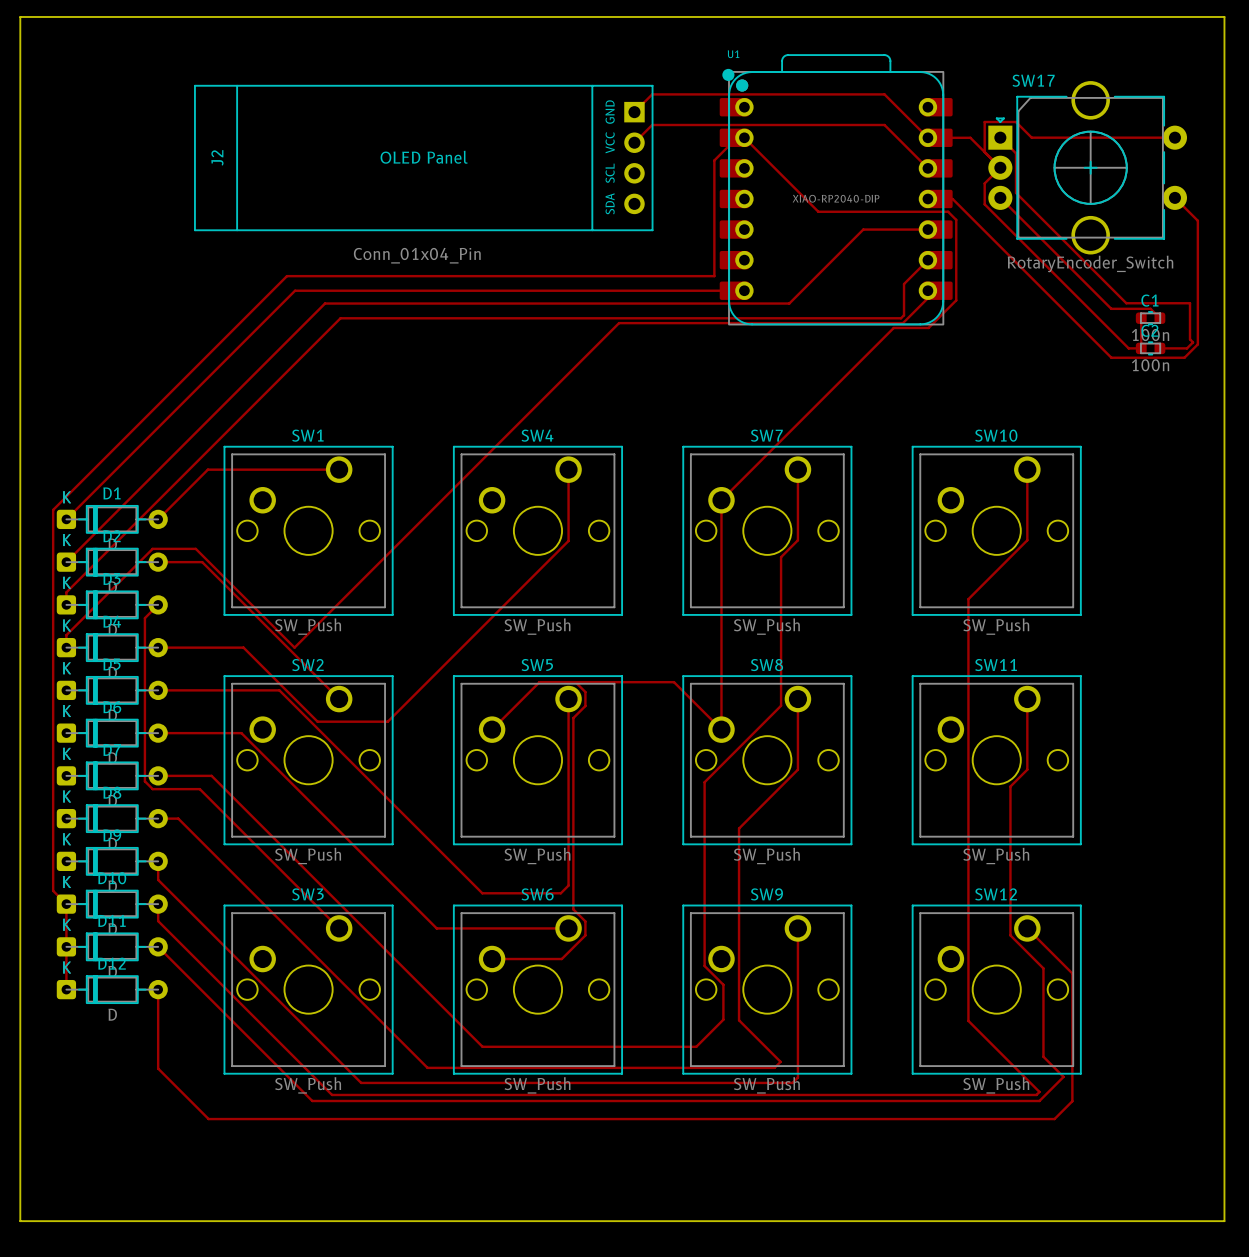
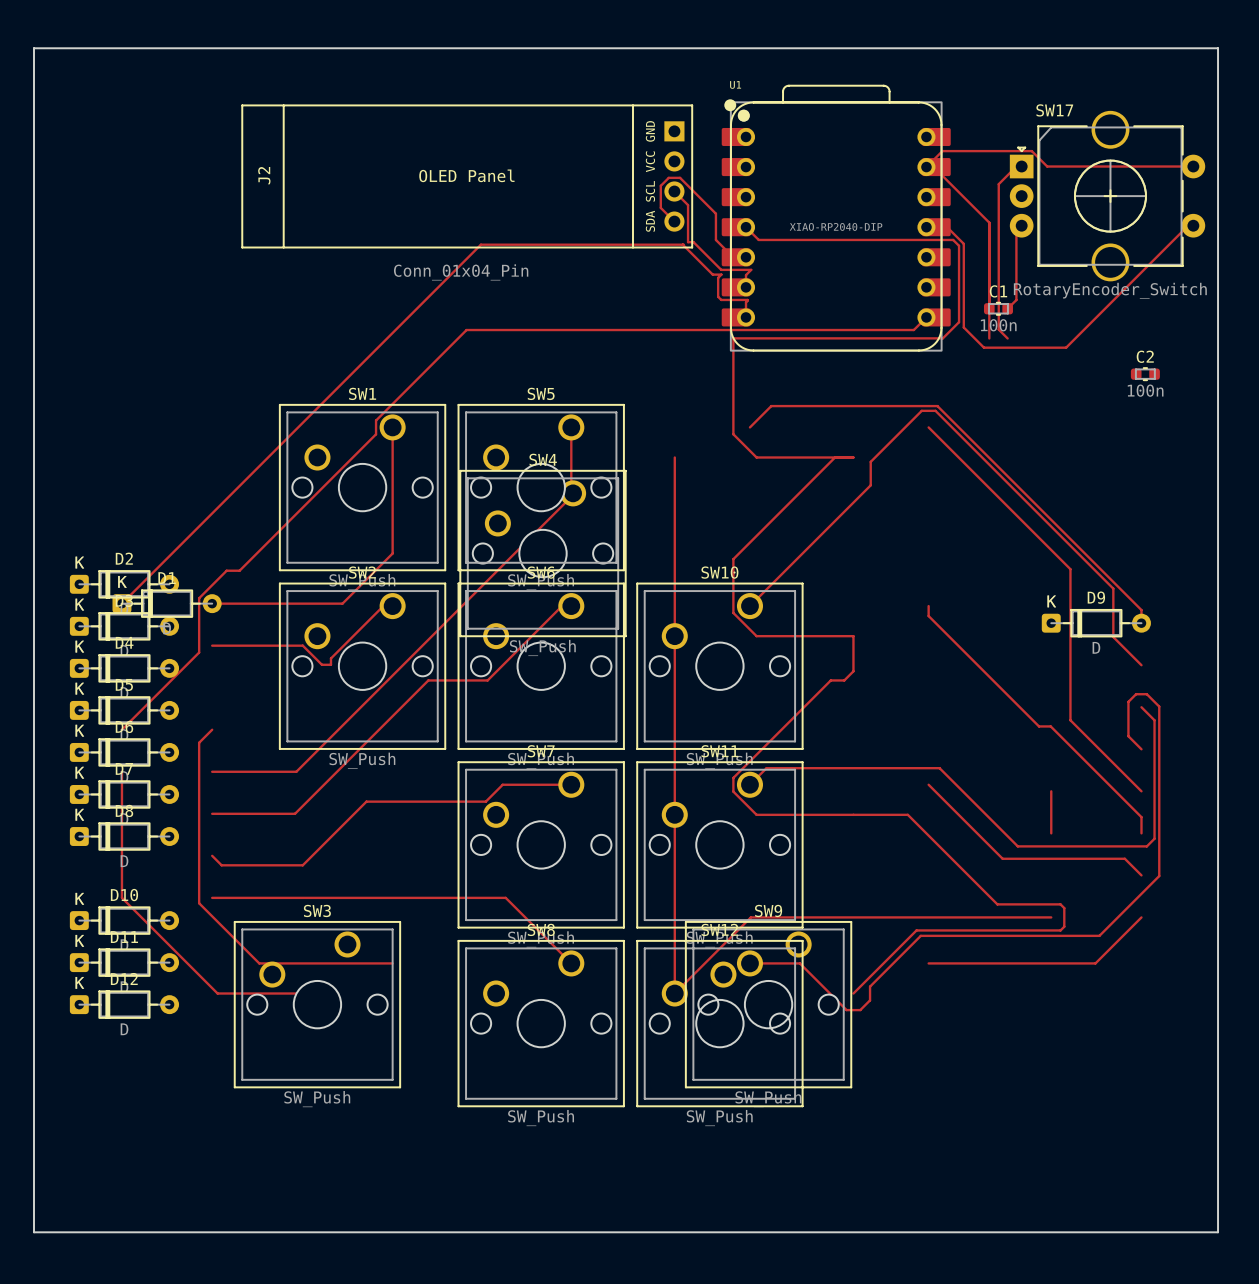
track: (634, 112) (652, 94) (884, 94) (927, 137) -> (1188, 166) (1047, 166) (1031, 151) (942, 151) (926, 167)
track: (935, 137) (970, 137) (1000, 167) (984, 183) (984, 204) (1128, 348) (1141, 348) (1141, 318) -> (933, 167) (989, 222) (989, 338)
track: (1000, 137) (1016, 153) (1016, 192) (1126, 303) (1190, 303) (1190, 339) (1193, 342) (1187, 348) (1159, 348) -> none
track: none -> (1016, 166) (998, 184) (998, 329) (1007, 338)
track: (1174, 137) (1031, 137) (1016, 122) (984, 122) (984, 152) -> none
track: (634, 142) (652, 125) (884, 125) (927, 168) -> none
J2 position: (423, 158) -> (467, 176)
track: none -> (674, 191) (688, 205) (688, 242) (693, 242) (721, 269) (751, 269) (746, 275) (746, 287)
SW17 position: (1087, 167) -> (1107, 196)
track: none -> (674, 221) (660, 207) (660, 185) (668, 177) (680, 177) (715, 213) (715, 239) (733, 257) (746, 257)
track: (1000, 197) (1111, 308) (1150, 308) (1159, 318) -> none
track: none -> (1016, 225) (1016, 300) (1007, 308)
track: (1174, 197) (1197, 220) (1197, 344) (1184, 357) (1111, 357) (952, 198) (948, 198) -> (1188, 225) (1066, 347) (983, 347) (963, 327) (963, 243) (947, 227)
track: none -> (683, 244) (480, 244) (121, 603)
track: (927, 229) (863, 229) (789, 303) -> (926, 317) (913, 330) (790, 330)
track: (927, 260) (904, 284) (904, 315) (901, 318) (340, 318) (66, 592) (66, 604) -> none
track: (744, 290) (295, 290) (66, 519) -> (746, 317) (747, 299) (721, 299) (718, 296) (718, 277) (721, 274) (712, 274) (682, 244)
track: (927, 290) (927, 298) (903, 323) (619, 323) (294, 647) (195, 548) (152, 548) (66, 635) (66, 647) -> none
track: (956, 300) (956, 219) (948, 211) (818, 211) (744, 137) (737, 137) (714, 160) (714, 276) (286, 276) (53, 509) (53, 890) (66, 904) (66, 989) -> (954, 326) (959, 322) (959, 245) (953, 239) (758, 239) (746, 227)
track: (460, 303) (325, 303) (66, 562) -> (466, 330) (376, 420) (376, 434) (239, 570) (226, 570) (199, 598) (199, 652) (121, 729)
track: (944, 312) (928, 327) (893, 327) (721, 500) (721, 729) (674, 682) (539, 682) (492, 729) -> (942, 338) (733, 338) (733, 434) (756, 457) (853, 457)
C1 position: (1150, 318) -> (998, 308)
track: none -> (392, 427) (392, 553) (342, 603) (212, 603)
track: none -> (571, 427) (571, 496) (296, 771) (212, 771)
track: none -> (749, 427) (771, 406) (937, 406) (1141, 610) (1141, 623)
track: none -> (928, 427) (1070, 569) (1070, 720) (1141, 791)
track: none -> (674, 457) (674, 993) (750, 917) (1051, 917)
track: none -> (835, 457) (733, 559) (733, 612) (756, 636) (853, 636) (853, 671) (844, 680) (830, 680) (733, 777) (733, 791) (756, 814) (907, 814) (997, 904) (1060, 904) (1064, 908) (1064, 926) (1060, 930) (916, 930) (853, 993)
track: (339, 469) (207, 469) (158, 519) -> none
track: (568, 469) (568, 540) (387, 721) (317, 721) (243, 647) (158, 647) -> none
track: (797, 469) (797, 540) (781, 557) (781, 705) (704, 782) (704, 966) (723, 984) (723, 1019) (696, 1046) (482, 1046) (211, 775) (158, 775) -> none
track: (1027, 469) (1027, 540) (968, 599) (968, 1020) (1039, 1091) (1036, 1094) (332, 1094) (158, 921) (158, 904) -> none
D1 position: (112, 519) -> (167, 603)
SW1 position: (308, 530) -> (362, 487)
SW7 position: (767, 530) -> (541, 844)
SW10 position: (996, 530) -> (719, 666)
track: (158, 562) (202, 562) (339, 699) -> none
track: none -> (392, 606) (383, 606) (330, 658) (330, 664) (321, 664) (302, 645) (212, 645)
track: none -> (571, 606) (562, 606) (487, 680) (428, 680) (295, 813) (212, 813)
track: none -> (749, 606) (870, 485) (870, 461) (921, 410) (935, 410) (1113, 588) (1113, 637) (1141, 665)
track: none -> (928, 606) (928, 616) (1039, 726) (1050, 726) (1141, 817) (1141, 833)
track: (158, 604) (144, 618) (144, 781) (152, 789) (199, 789) (339, 928) -> none
track: (575, 682) (585, 692) (585, 706) (573, 718) (573, 909) (585, 921) (585, 935) (561, 959) (492, 959) -> none
track: none -> (1141, 707) (1154, 720) (1154, 838) (1146, 846) (1017, 846) (939, 768) (766, 768) (749, 784)
track: (158, 690) (279, 690) (482, 893) (560, 893) (568, 885) (568, 699) -> none
track: (797, 699) (797, 769) (739, 828) (739, 1020) (780, 1061) (774, 1067) (427, 1067) (178, 818) (158, 818) -> none
track: (1027, 699) (1027, 769) (1010, 786) (1010, 935) (1043, 968) (1043, 1056) (1063, 1076) (1039, 1101) (312, 1101) (158, 946) -> none
track: none -> (212, 729) (199, 742) (199, 903) (259, 963) (392, 963)
track: none -> (1141, 749) (1128, 736) (1128, 701) (1136, 694) (1146, 694) (1159, 706) (1159, 876) (1099, 935) (920, 935) (870, 986) (870, 1000) (860, 1010) (846, 1010) (799, 963) (749, 963)
track: (158, 733) (241, 733) (436, 928) (568, 928) -> none
track: none -> (121, 771) (121, 897) (217, 993) (317, 993)
SW2 position: (308, 760) -> (362, 666)
SW5 position: (537, 760) -> (541, 487)
SW8 position: (767, 760) -> (541, 1023)
SW11 position: (996, 760) -> (719, 844)
track: none -> (571, 784) (502, 784) (485, 801) (366, 801) (302, 865) (221, 865) (212, 855)
track: none -> (928, 784) (1002, 858) (1124, 858) (1141, 875)
track: none -> (1051, 791) (1051, 833)
D9 position: (112, 861) -> (1096, 623)
track: (158, 861) (158, 879) (361, 1082) (792, 1082) (797, 1077) (797, 928) -> none
track: none -> (212, 897) (505, 897) (571, 963)
track: none -> (1141, 917) (1095, 963) (928, 963)
track: (1027, 928) (1072, 973) (1072, 1101) (1054, 1119) (208, 1119) (158, 1068) (158, 989) -> none
SW6 position: (537, 989) -> (541, 666)
SW12 position: (996, 989) -> (719, 1023)

